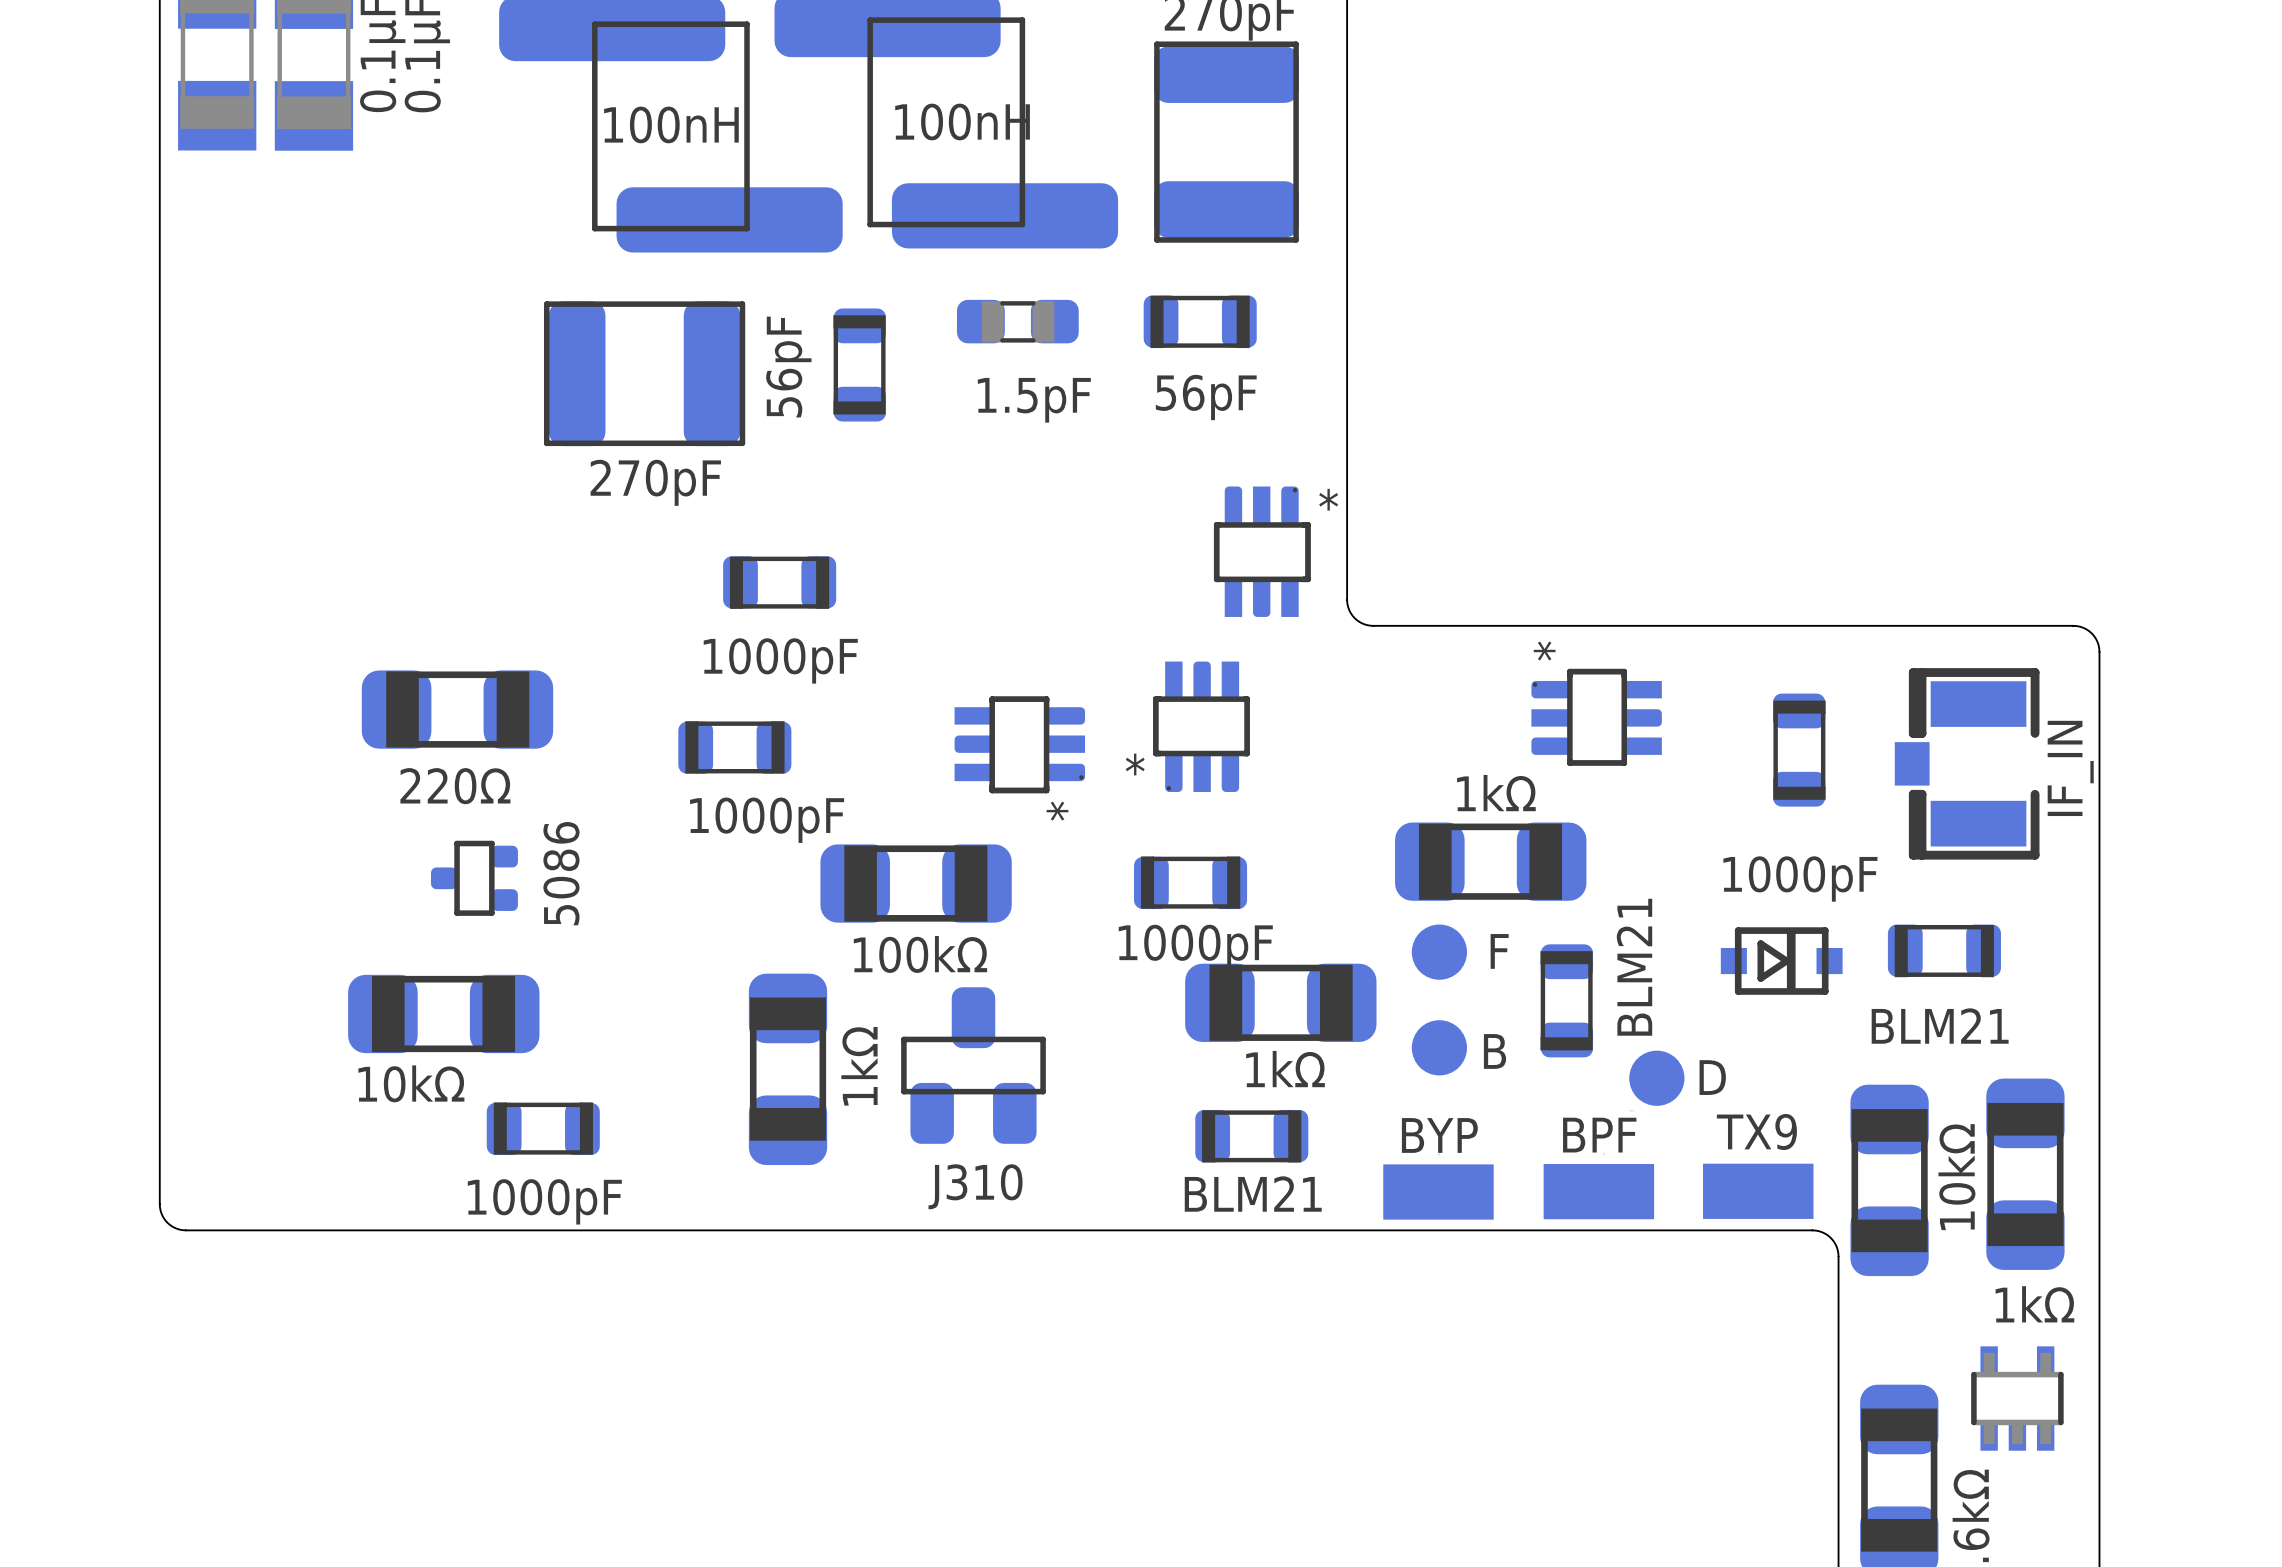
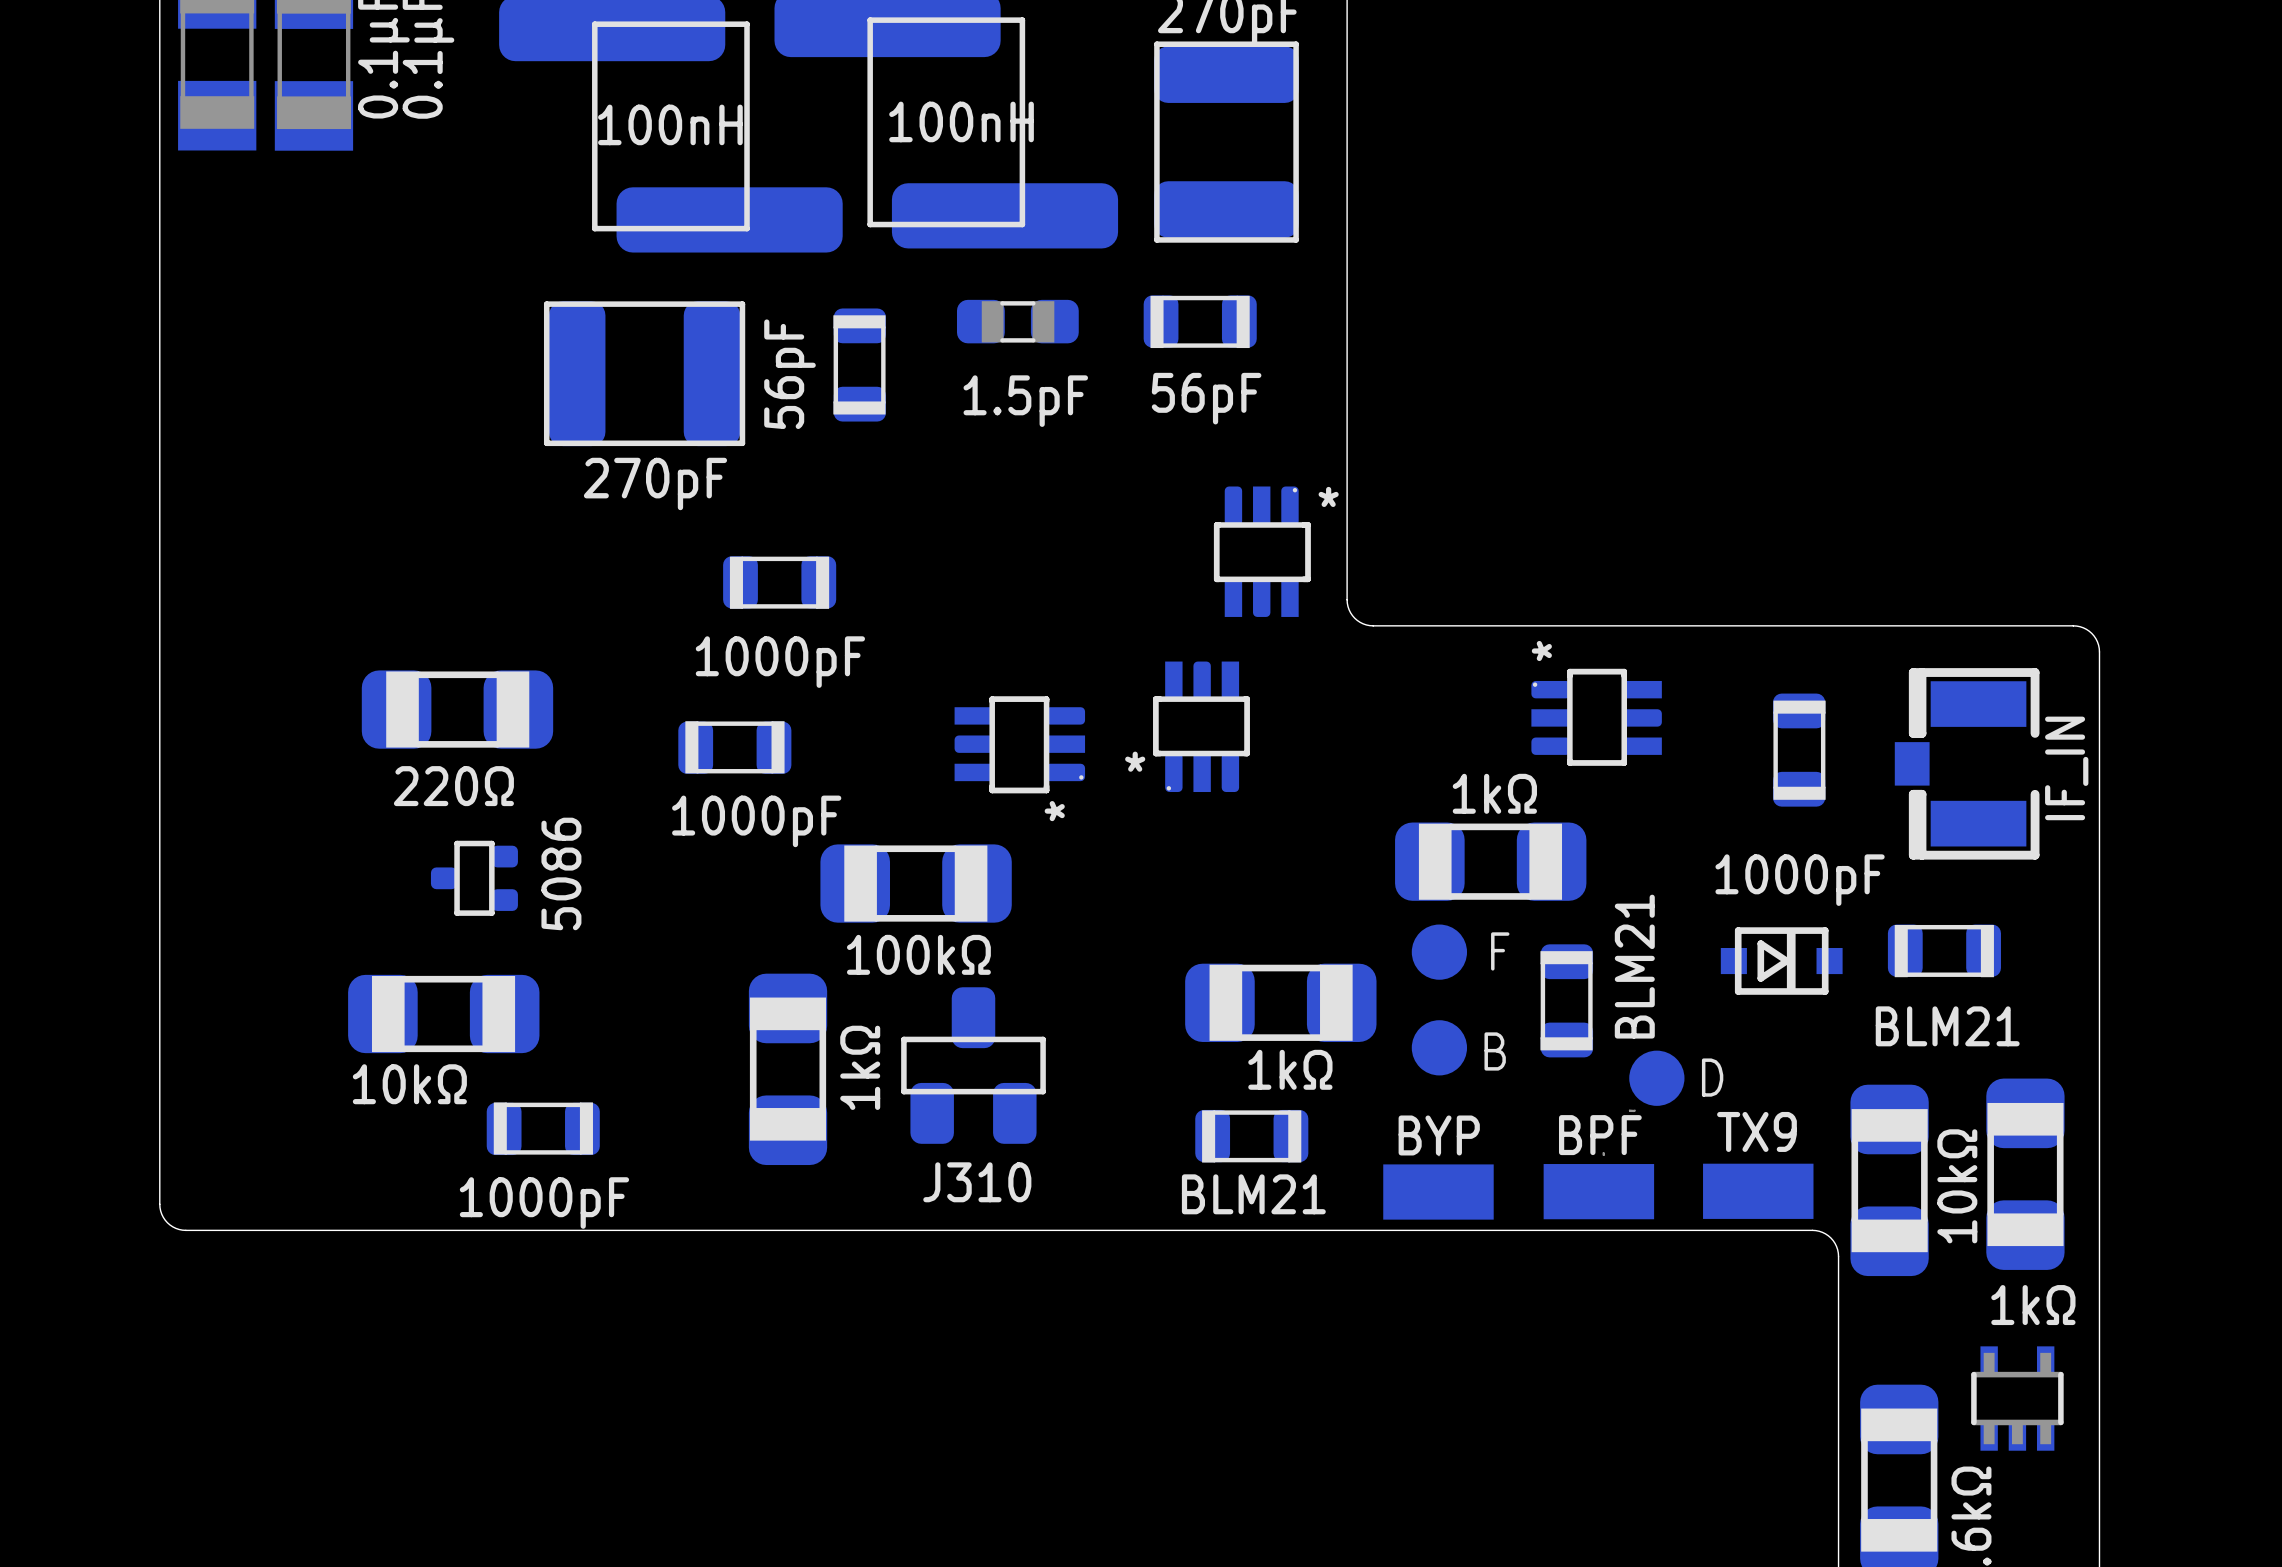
part: 1000pF (1190, 882) -> none

